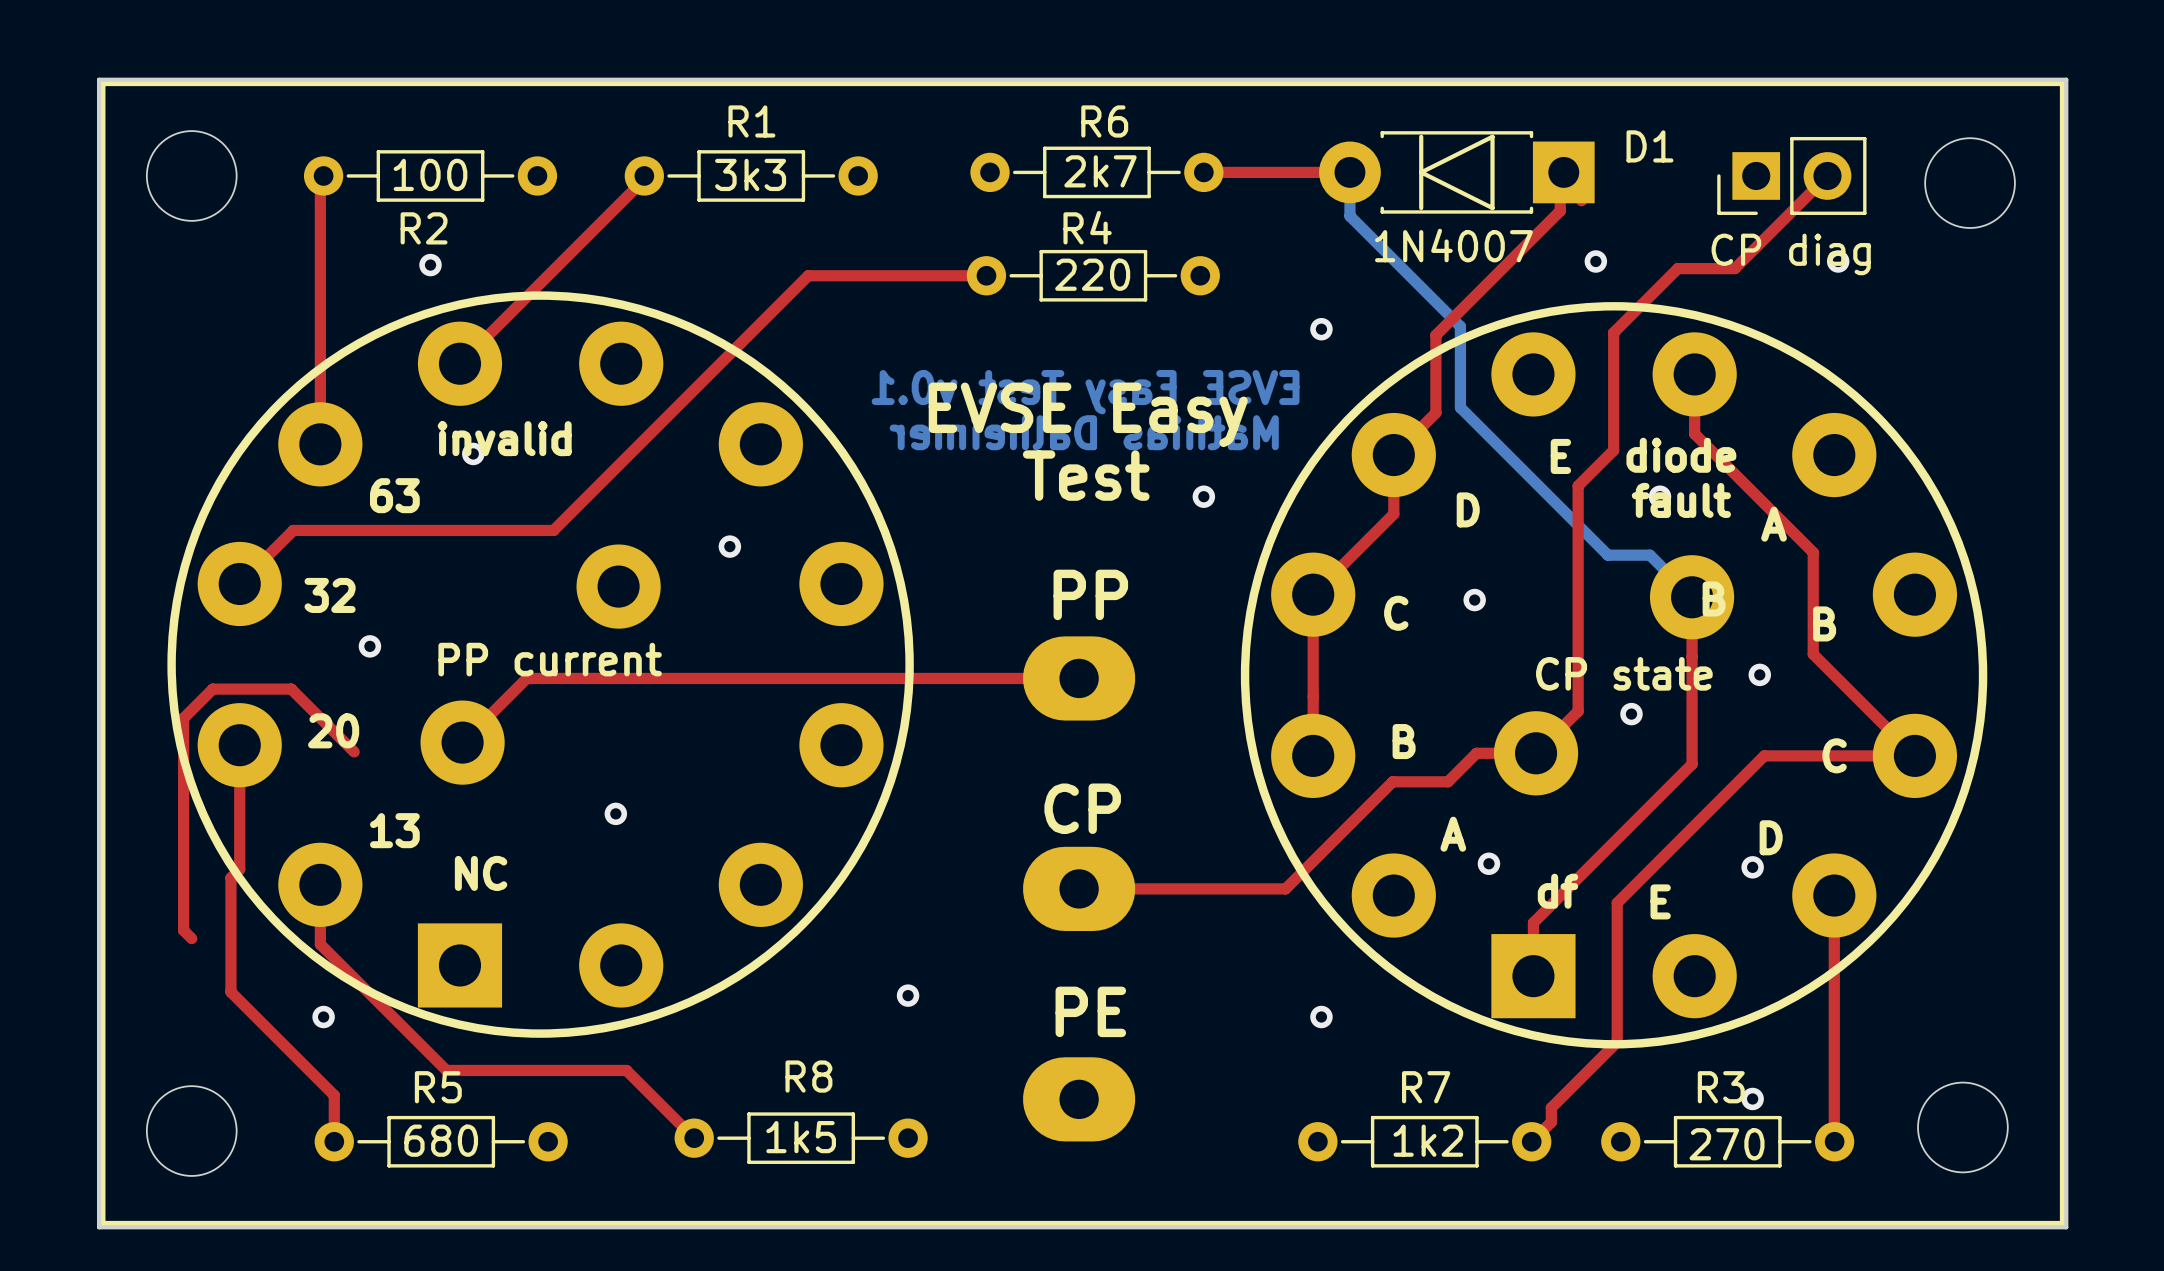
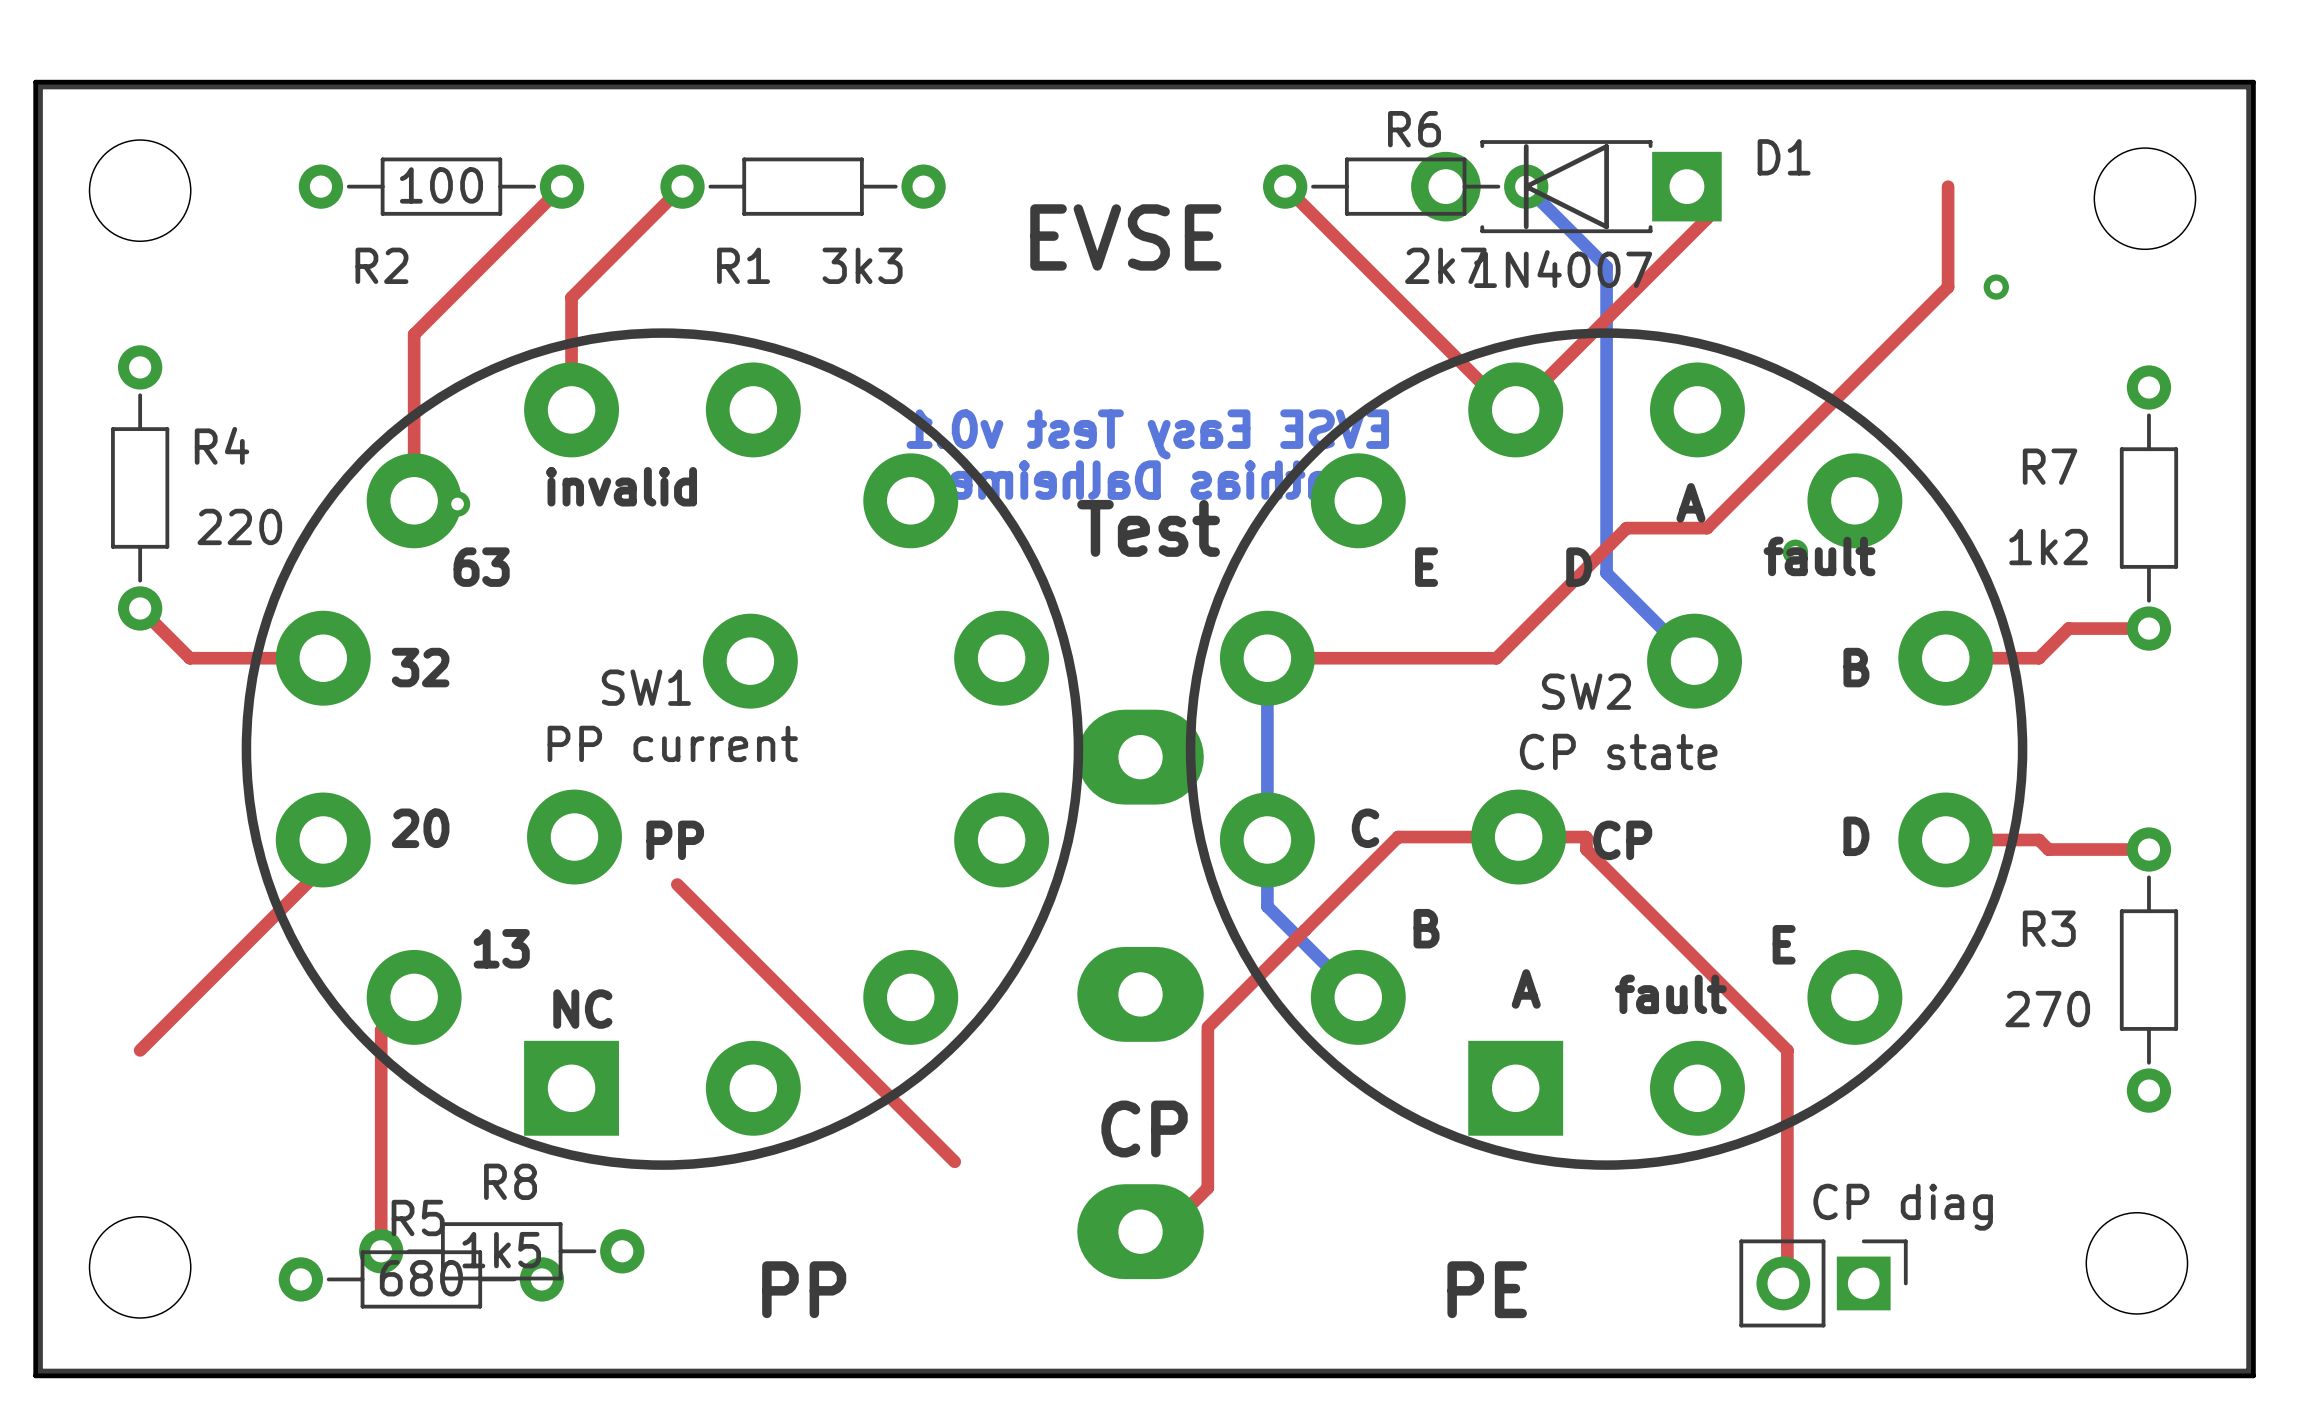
R1 name position: R1 (751, 121) -> R1 (743, 265)
top track: (1560, 168) (1560, 210) (1435, 335) (1435, 412) (1393, 455) (1393, 514) (1313, 594) (1313, 755) -> none
R6 value position: 2k7 (1100, 171) -> 2k7 (1445, 265)
top track: none -> (561, 186) (414, 334) (414, 500)
top track: none -> (682, 186) (571, 297) (571, 409)
R6 position: (1096, 172) -> (1405, 186)
top track: (1203, 172) (1349, 172) -> none
top track: none -> (1285, 186) (1508, 409) (1515, 409) (1707, 218)
bottom track: (1349, 172) (1349, 216) (1460, 326) (1460, 407) (1608, 555) (1649, 555) (1692, 597) -> none
bottom track: none -> (1526, 186) (1606, 266) (1606, 573) (1694, 661)
top track: none -> (1948, 186) (1948, 287) (1707, 528) (1626, 528) (1496, 658) (1267, 658)
R1 value position: 3k3 (750, 174) -> 3k3 (862, 265)
top track: (323, 175) (320, 179) (320, 444) -> none
R2 position: (430, 175) -> (441, 186)
top track: (644, 175) (644, 179) (459, 363) -> none
R1 position: (751, 175) -> (803, 186)
part: CP diag (1791, 175) -> none
top track: (1827, 175) (1734, 268) (1677, 268) (1613, 332) (1613, 450) (1578, 485) (1578, 711) (1536, 753) (1476, 753) (1448, 781) (1392, 781) (1285, 888) (1079, 888) -> none
text: none -> EVSE (1125, 237)
R2 name position: R2 (424, 228) -> R2 (381, 265)
via: (1595, 261) -> none
via: (430, 265) -> none
R4 value position: 220 (1092, 274) -> 220 (239, 526)
top track: (986, 275) (808, 275) (553, 530) (293, 530) (239, 583) -> none
R4 rotation: 0° (1093, 275) -> 90° clockwise (140, 487)
R4 position: (1093, 275) -> (140, 487)
via: (1321, 329) -> none
top track: (1694, 374) (1694, 433) (1813, 552) (1813, 654) (1914, 755) (1764, 755) (1617, 902) (1617, 1041) (1551, 1107) (1551, 1122) (1531, 1141) -> none
text: EVSE Easy (1088, 414) -> none
text position: invalid (504, 438) -> invalid (621, 486)
text: diode (1681, 455) -> none
text: E (1560, 456) -> A (1690, 502)
text position: 63 (394, 495) -> 63 (481, 567)
via: (1203, 496) -> none
text: none -> E (1426, 567)
text: A (1774, 524) -> none
top track: none -> (140, 608) (189, 658) (323, 658)
via: (729, 546) -> none
top track: none -> (2148, 628) (2068, 628) (2038, 658) (1945, 658)
bottom track: none -> (1267, 658) (1267, 906) (1358, 997)
text: PP (1090, 594) -> none
text position: 32 (330, 595) -> 32 (420, 667)
top track: (1692, 597) (1692, 764) (1533, 922) (1533, 976) -> none
via: (1474, 600) -> none
text position: C (1396, 613) -> C (1365, 828)
text: B (1824, 623) -> none
via: (369, 646) -> none
part: PP current (540, 664) -> none
SW1: none -> PP current (662, 749)
SW2: none -> CP state (1606, 749)
via: (1759, 674) -> none
part: CP state (1614, 675) -> none
top track: (1079, 678) (526, 678) (462, 742) -> none
via: (1631, 714) -> none
text position: 20 (333, 730) -> 20 (420, 828)
text position: B (1404, 741) -> B (1426, 928)
top track: (239, 745) (239, 869) (230, 878) (230, 992) (334, 1095) (334, 1141) -> none
top track: (354, 751) (291, 689) (212, 689) (183, 718) (183, 930) (191, 938) -> (323, 839) (323, 867) (140, 1050)
top track: none -> (1945, 839) (2038, 839) (2048, 849) (2148, 849)
text: none -> PP (675, 840)
text: none -> CP (1622, 840)
text: C (1834, 755) -> none
top track: none -> (677, 884) (954, 1161)
text position: CP (1082, 808) -> CP (1144, 1129)
via: (615, 813) -> none
text position: 13 (394, 830) -> 13 (501, 948)
text position: A (1453, 834) -> A (1526, 988)
text position: D (1771, 837) -> D (1856, 836)
via: (1488, 863) -> none
via: (1752, 867) -> none
text position: NC (481, 873) -> NC (582, 1009)
top track: (320, 884) (320, 944) (446, 1070) (626, 1070) (694, 1138) -> none
top track: none -> (414, 997) (381, 1030) (381, 1251)
text: df (1557, 891) -> fault (1670, 994)
top track: (1834, 895) (1834, 1141) -> none
text position: E (1660, 901) -> E (1784, 944)
top track: none -> (1207, 1027) (1398, 837) (1585, 837) (1586, 849) (1787, 1050) (1787, 1279) (1783, 1283)
top track: none -> (1207, 1030) (1207, 1188) (1144, 1251)
via: (908, 995) -> none
text position: PE (1090, 1011) -> PE (1487, 1289)
via: (323, 1017) -> none
via: (1321, 1017) -> none
R7 name position: R7 (1426, 1087) -> R7 (2050, 466)
R3 name position: R3 (1721, 1087) -> R3 (2049, 928)
via: (1752, 1098) -> none
R8 position: (801, 1138) -> (501, 1251)
R7 value position: 1k2 (1428, 1140) -> 1k2 (2048, 547)
R7 rotation: 0° (1424, 1141) -> 90° clockwise (2148, 508)
R7 position: (1424, 1141) -> (2148, 508)
R3 rotation: 0° (1727, 1141) -> 90° clockwise (2148, 970)
R3 position: (1727, 1141) -> (2148, 970)
R3 value position: 270 (1727, 1144) -> 270 (2047, 1009)
part: none -> CP diag (1823, 1283)
text: none -> PP (804, 1289)

